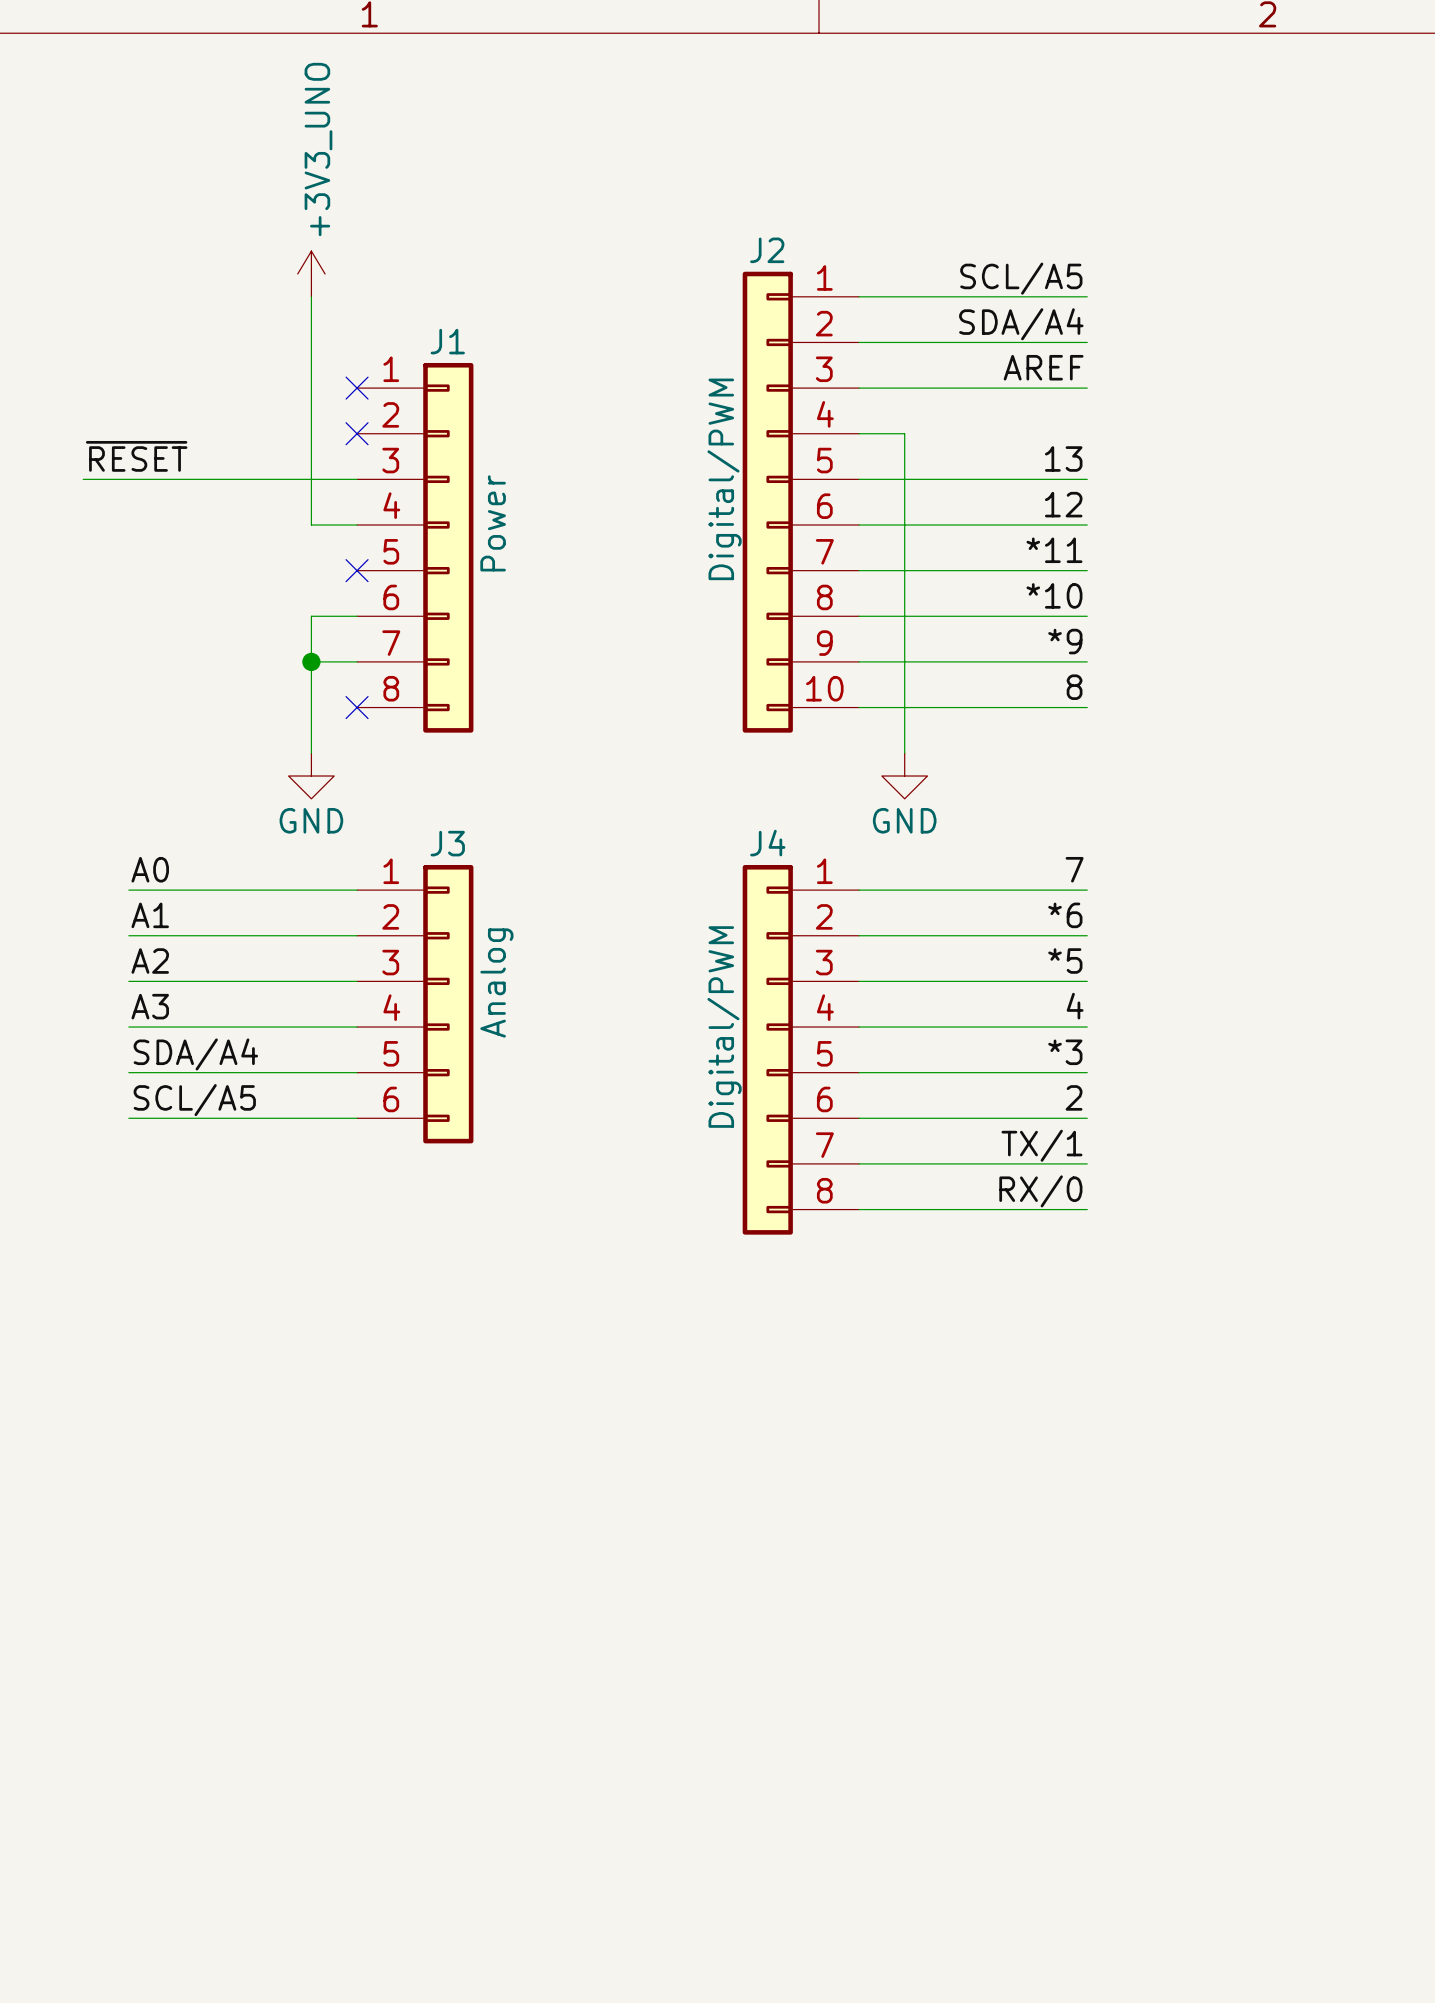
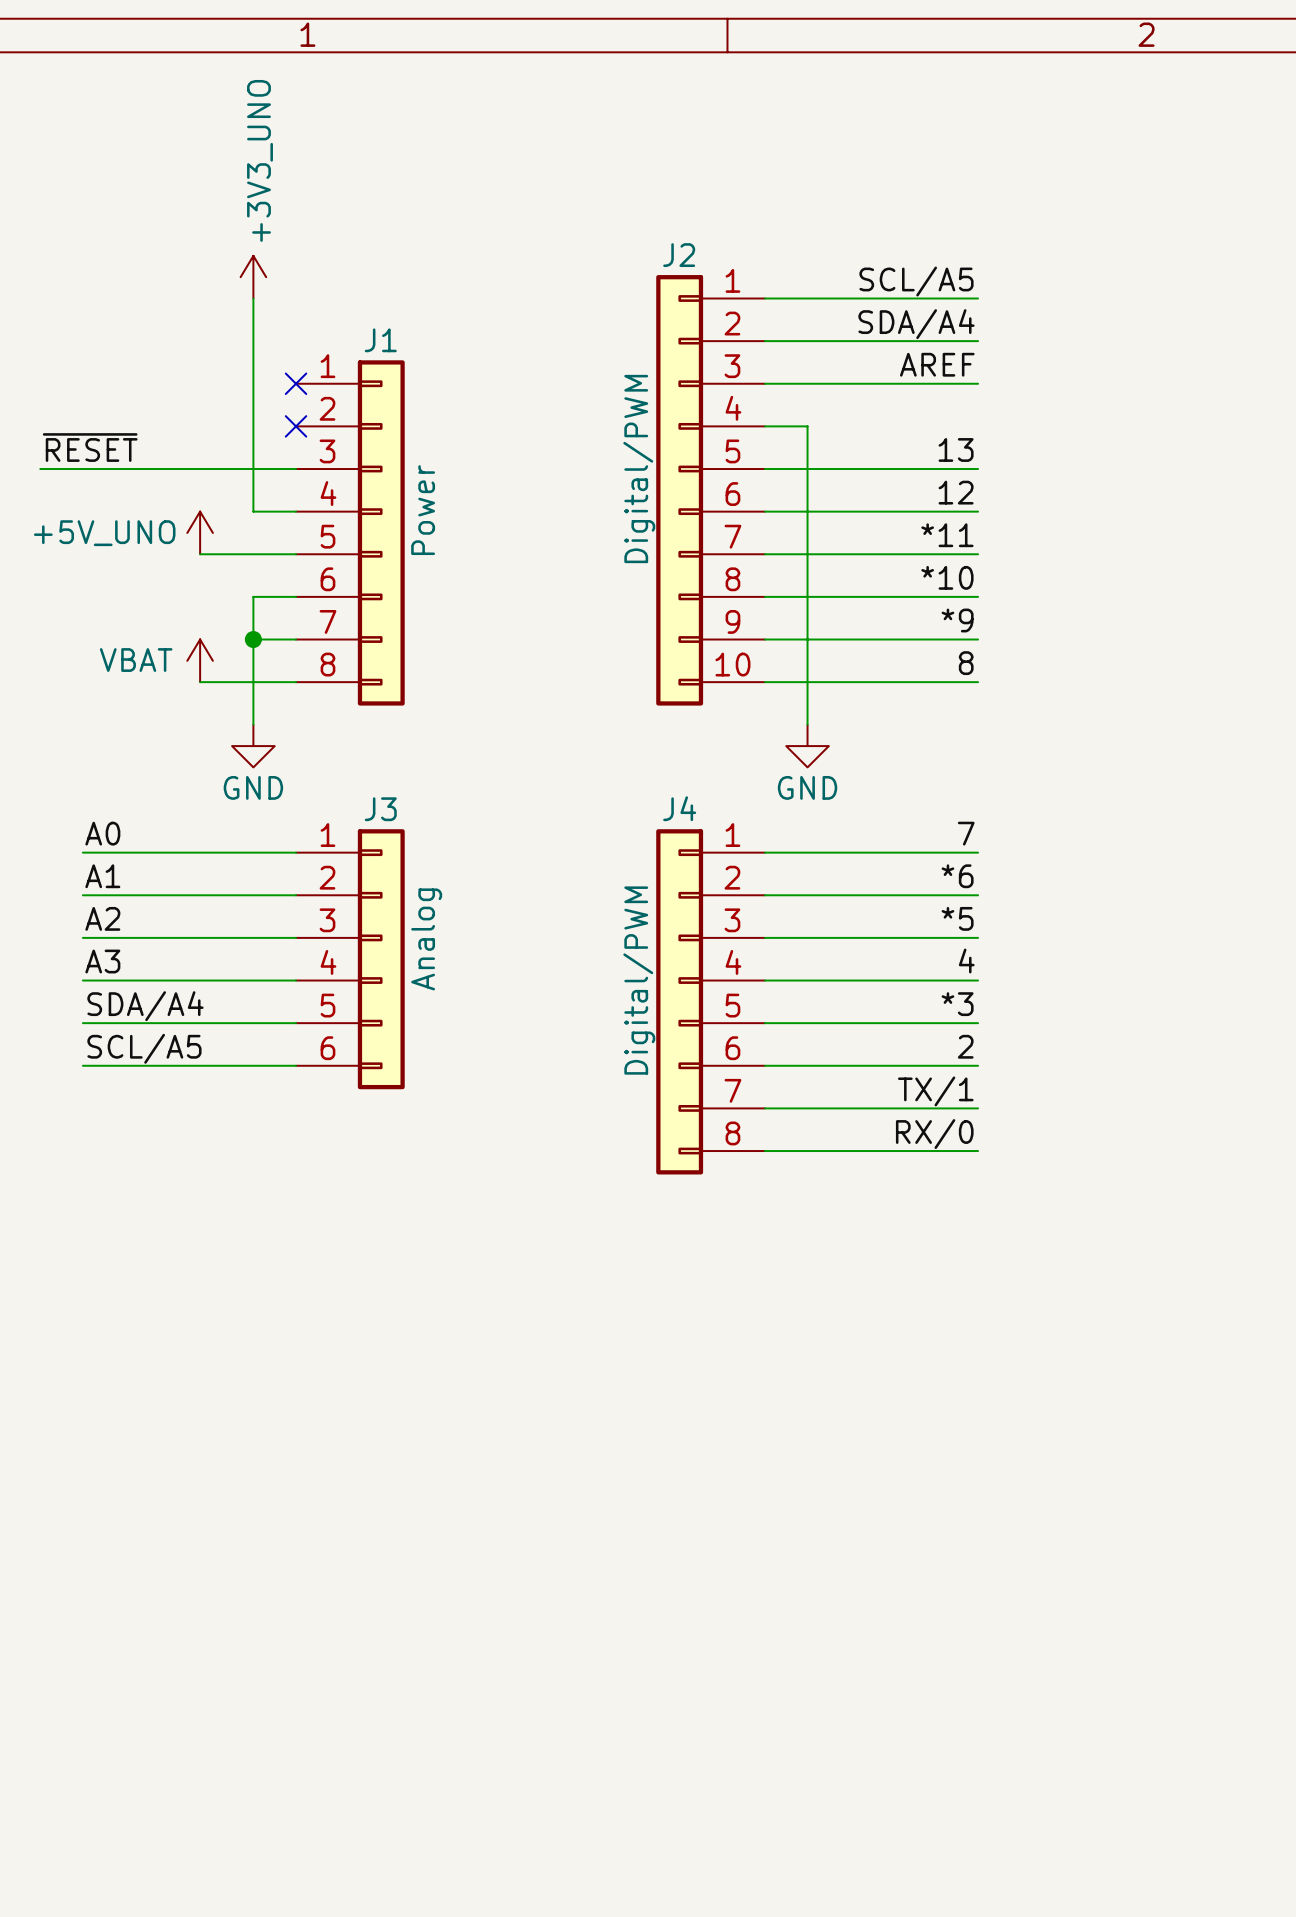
power symbol: none -> +5V_UNO (200, 532)
wire: none -> (200, 554) (296, 554)
no-connect mark: (357, 570) -> none
power symbol: none -> VBAT (200, 660)
wire: none -> (200, 682) (296, 682)
no-connect mark: (357, 707) -> none

